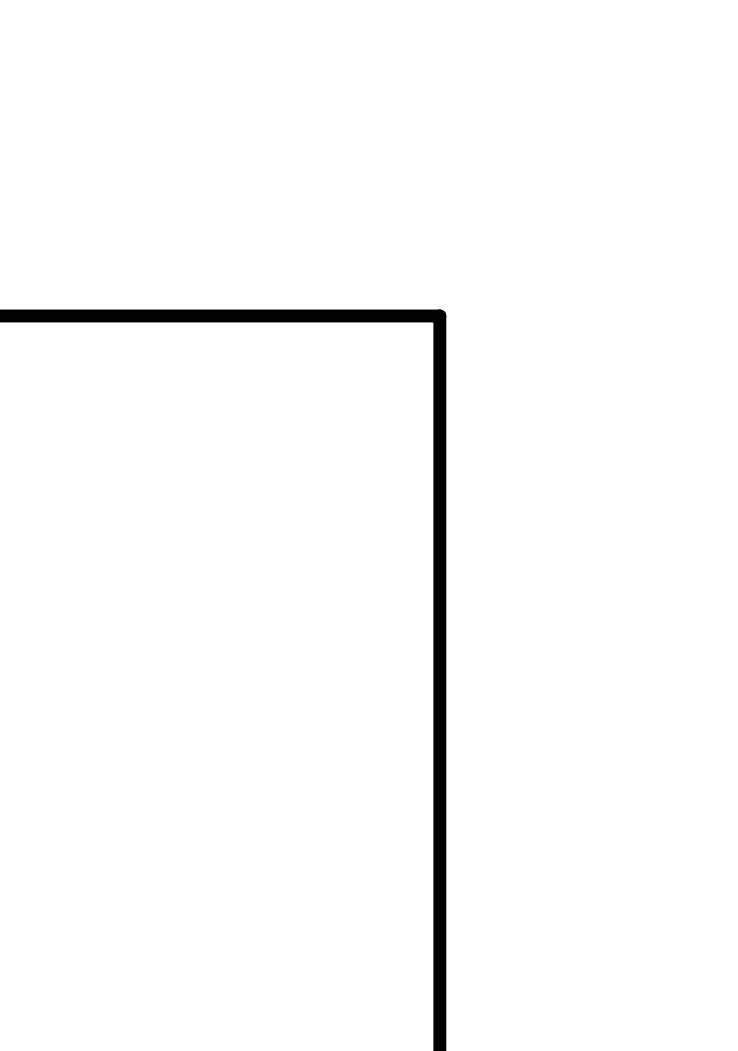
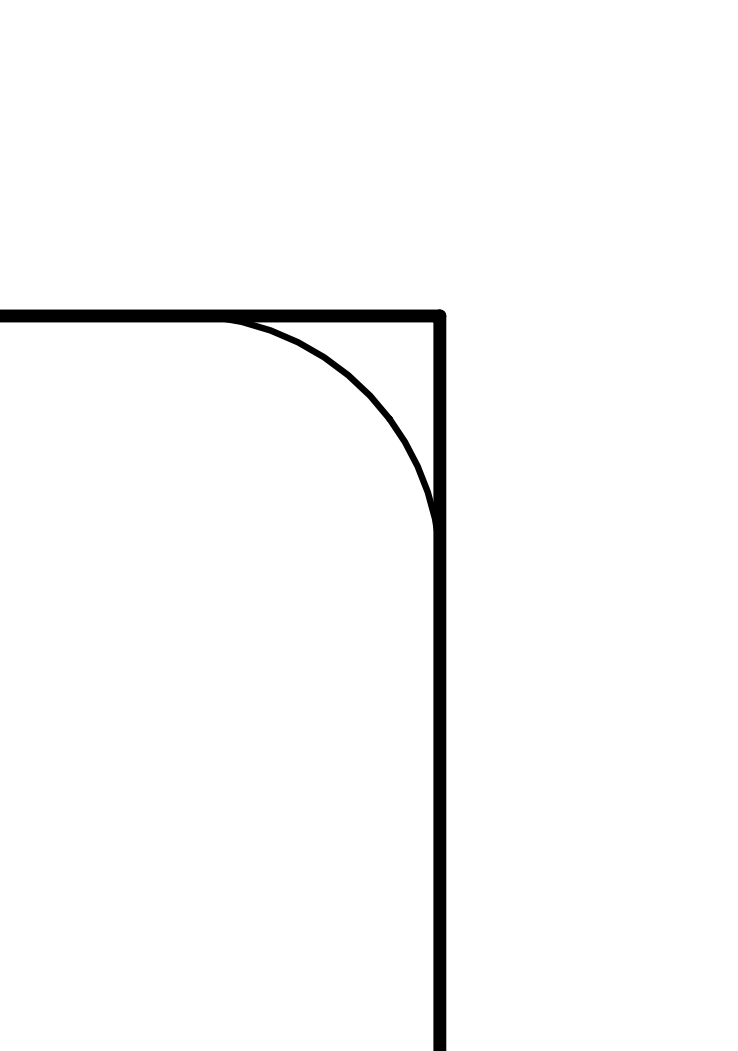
board edge: none -> (182, 314) (212, 316) (241, 321) (270, 330) (298, 342) (324, 357) (348, 375) (370, 395) (389, 418) (417, 466) (435, 518) (440, 573)

